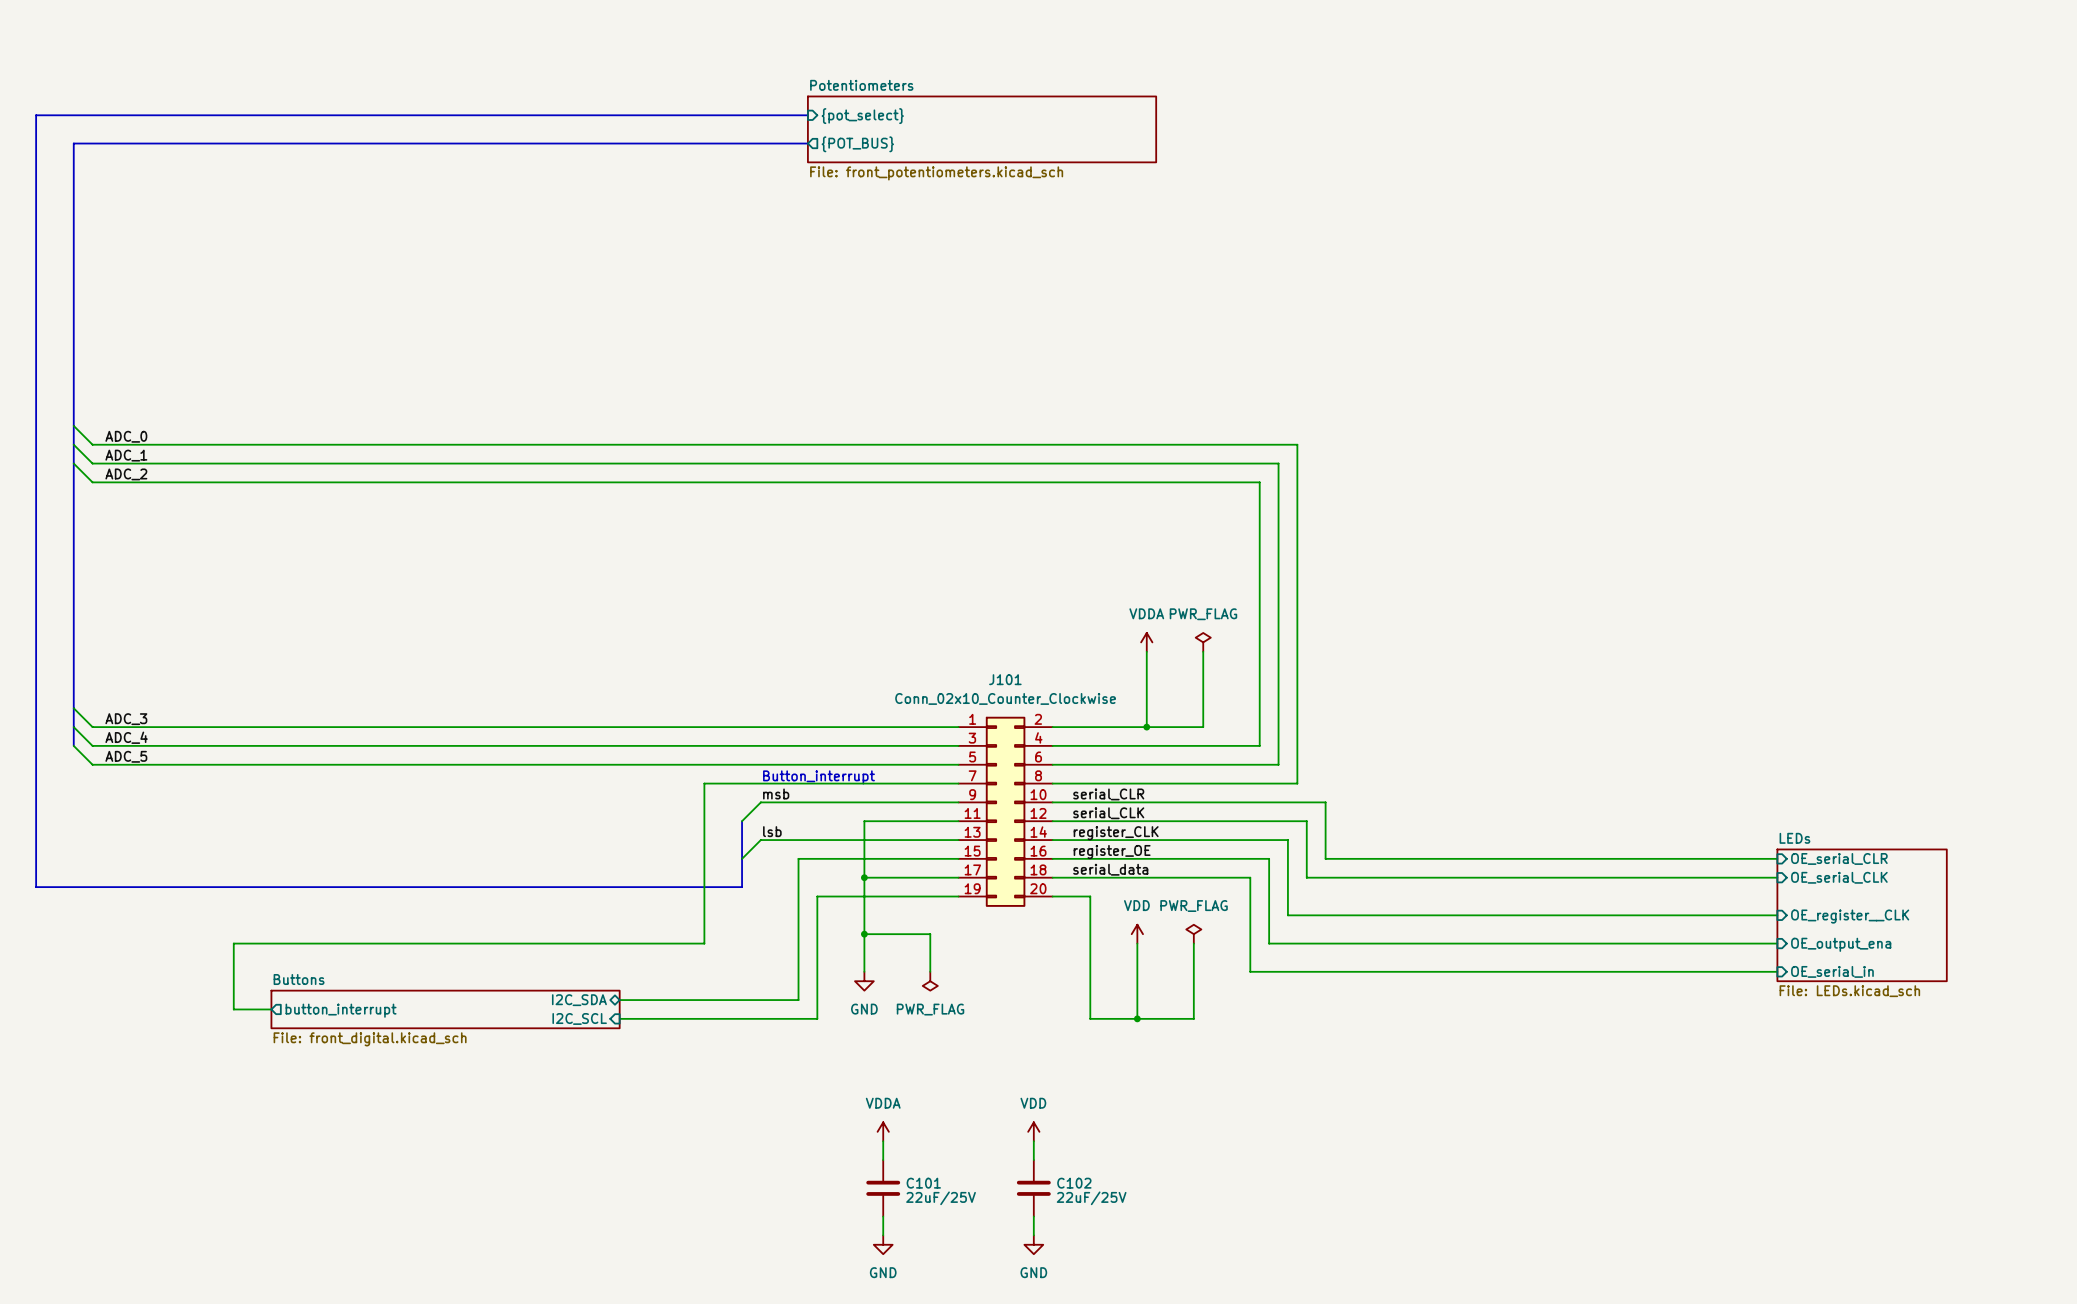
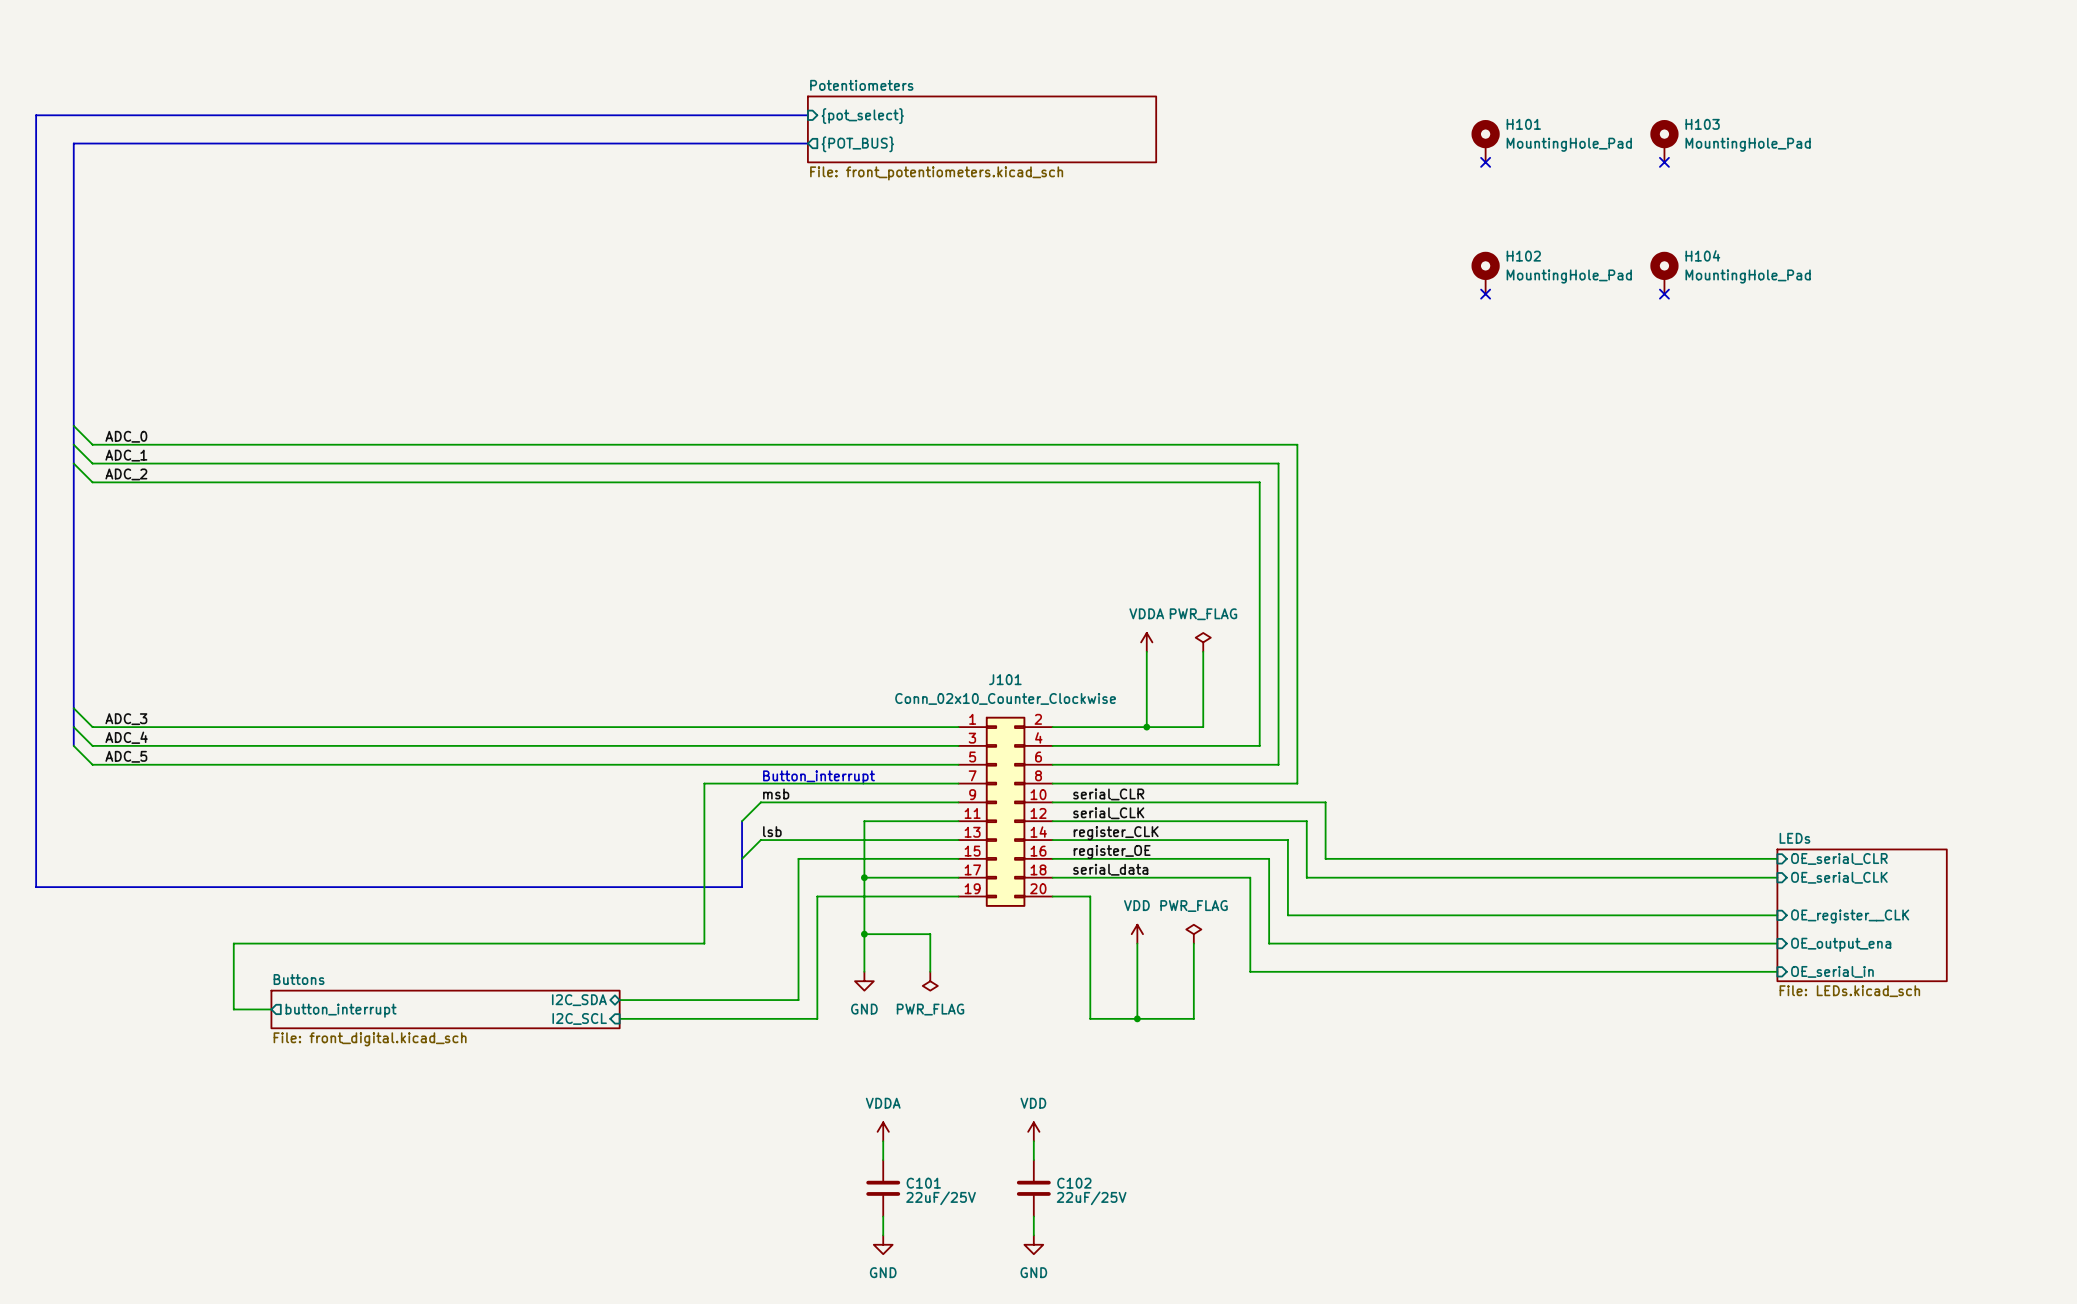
H101: none -> MountingHole_Pad (1485, 141)
H103: none -> MountingHole_Pad (1664, 141)
no-connect mark: none -> (1485, 162)
no-connect mark: none -> (1664, 162)
H102: none -> MountingHole_Pad (1485, 272)
H104: none -> MountingHole_Pad (1664, 272)
no-connect mark: none -> (1485, 294)
no-connect mark: none -> (1664, 294)

